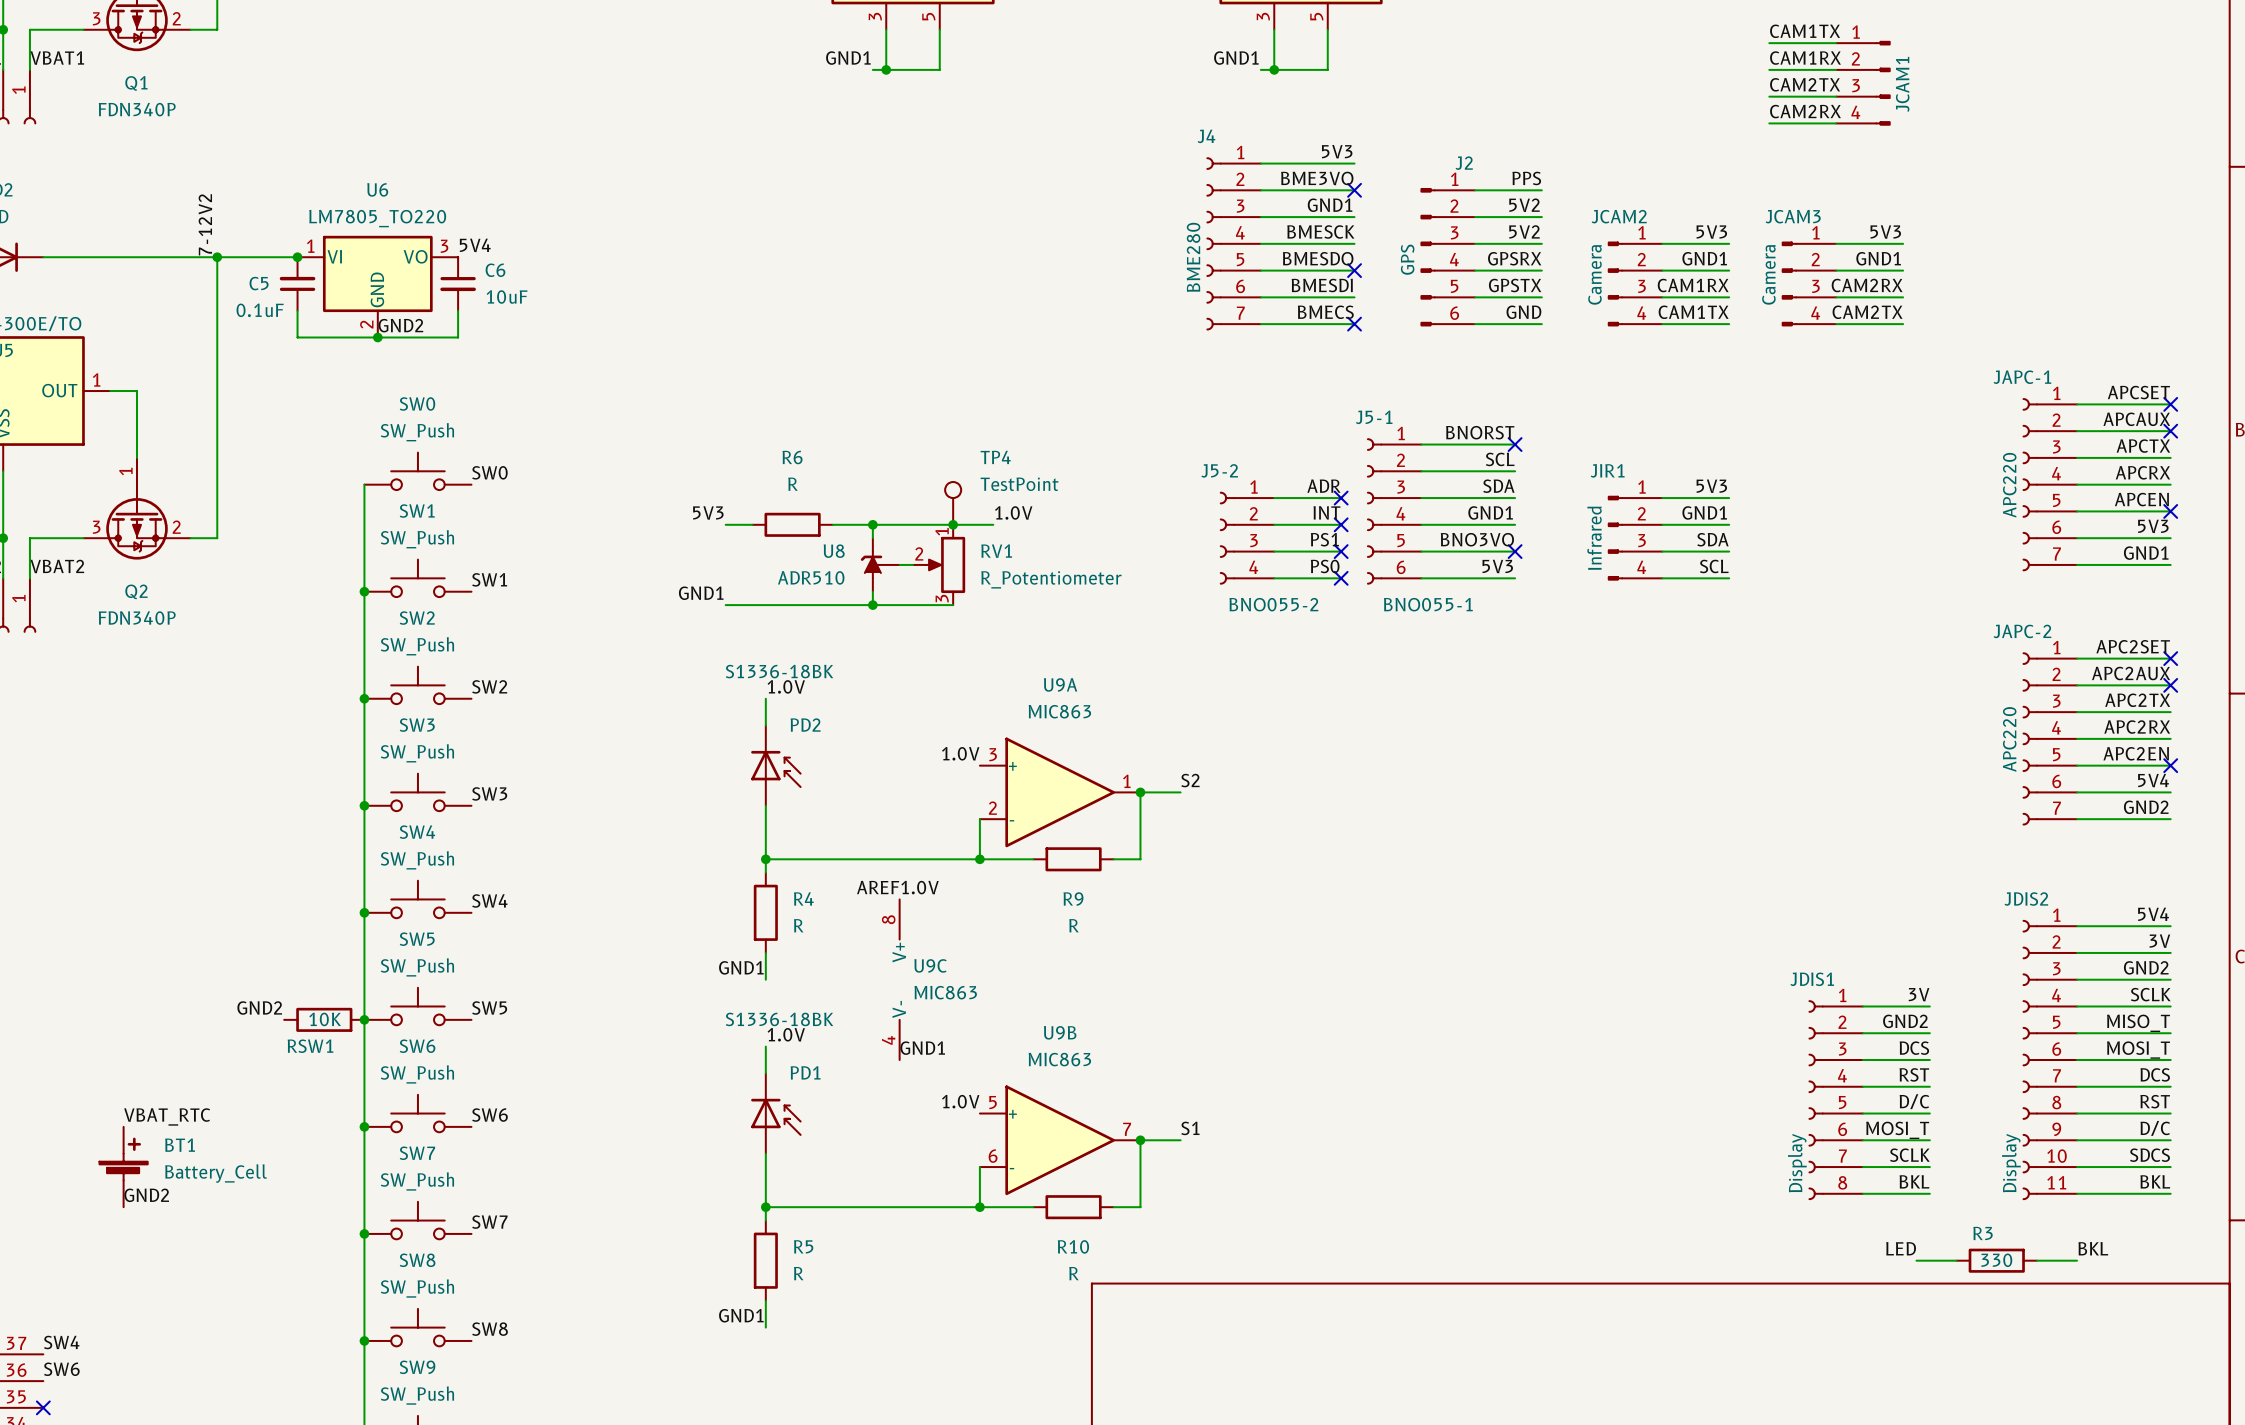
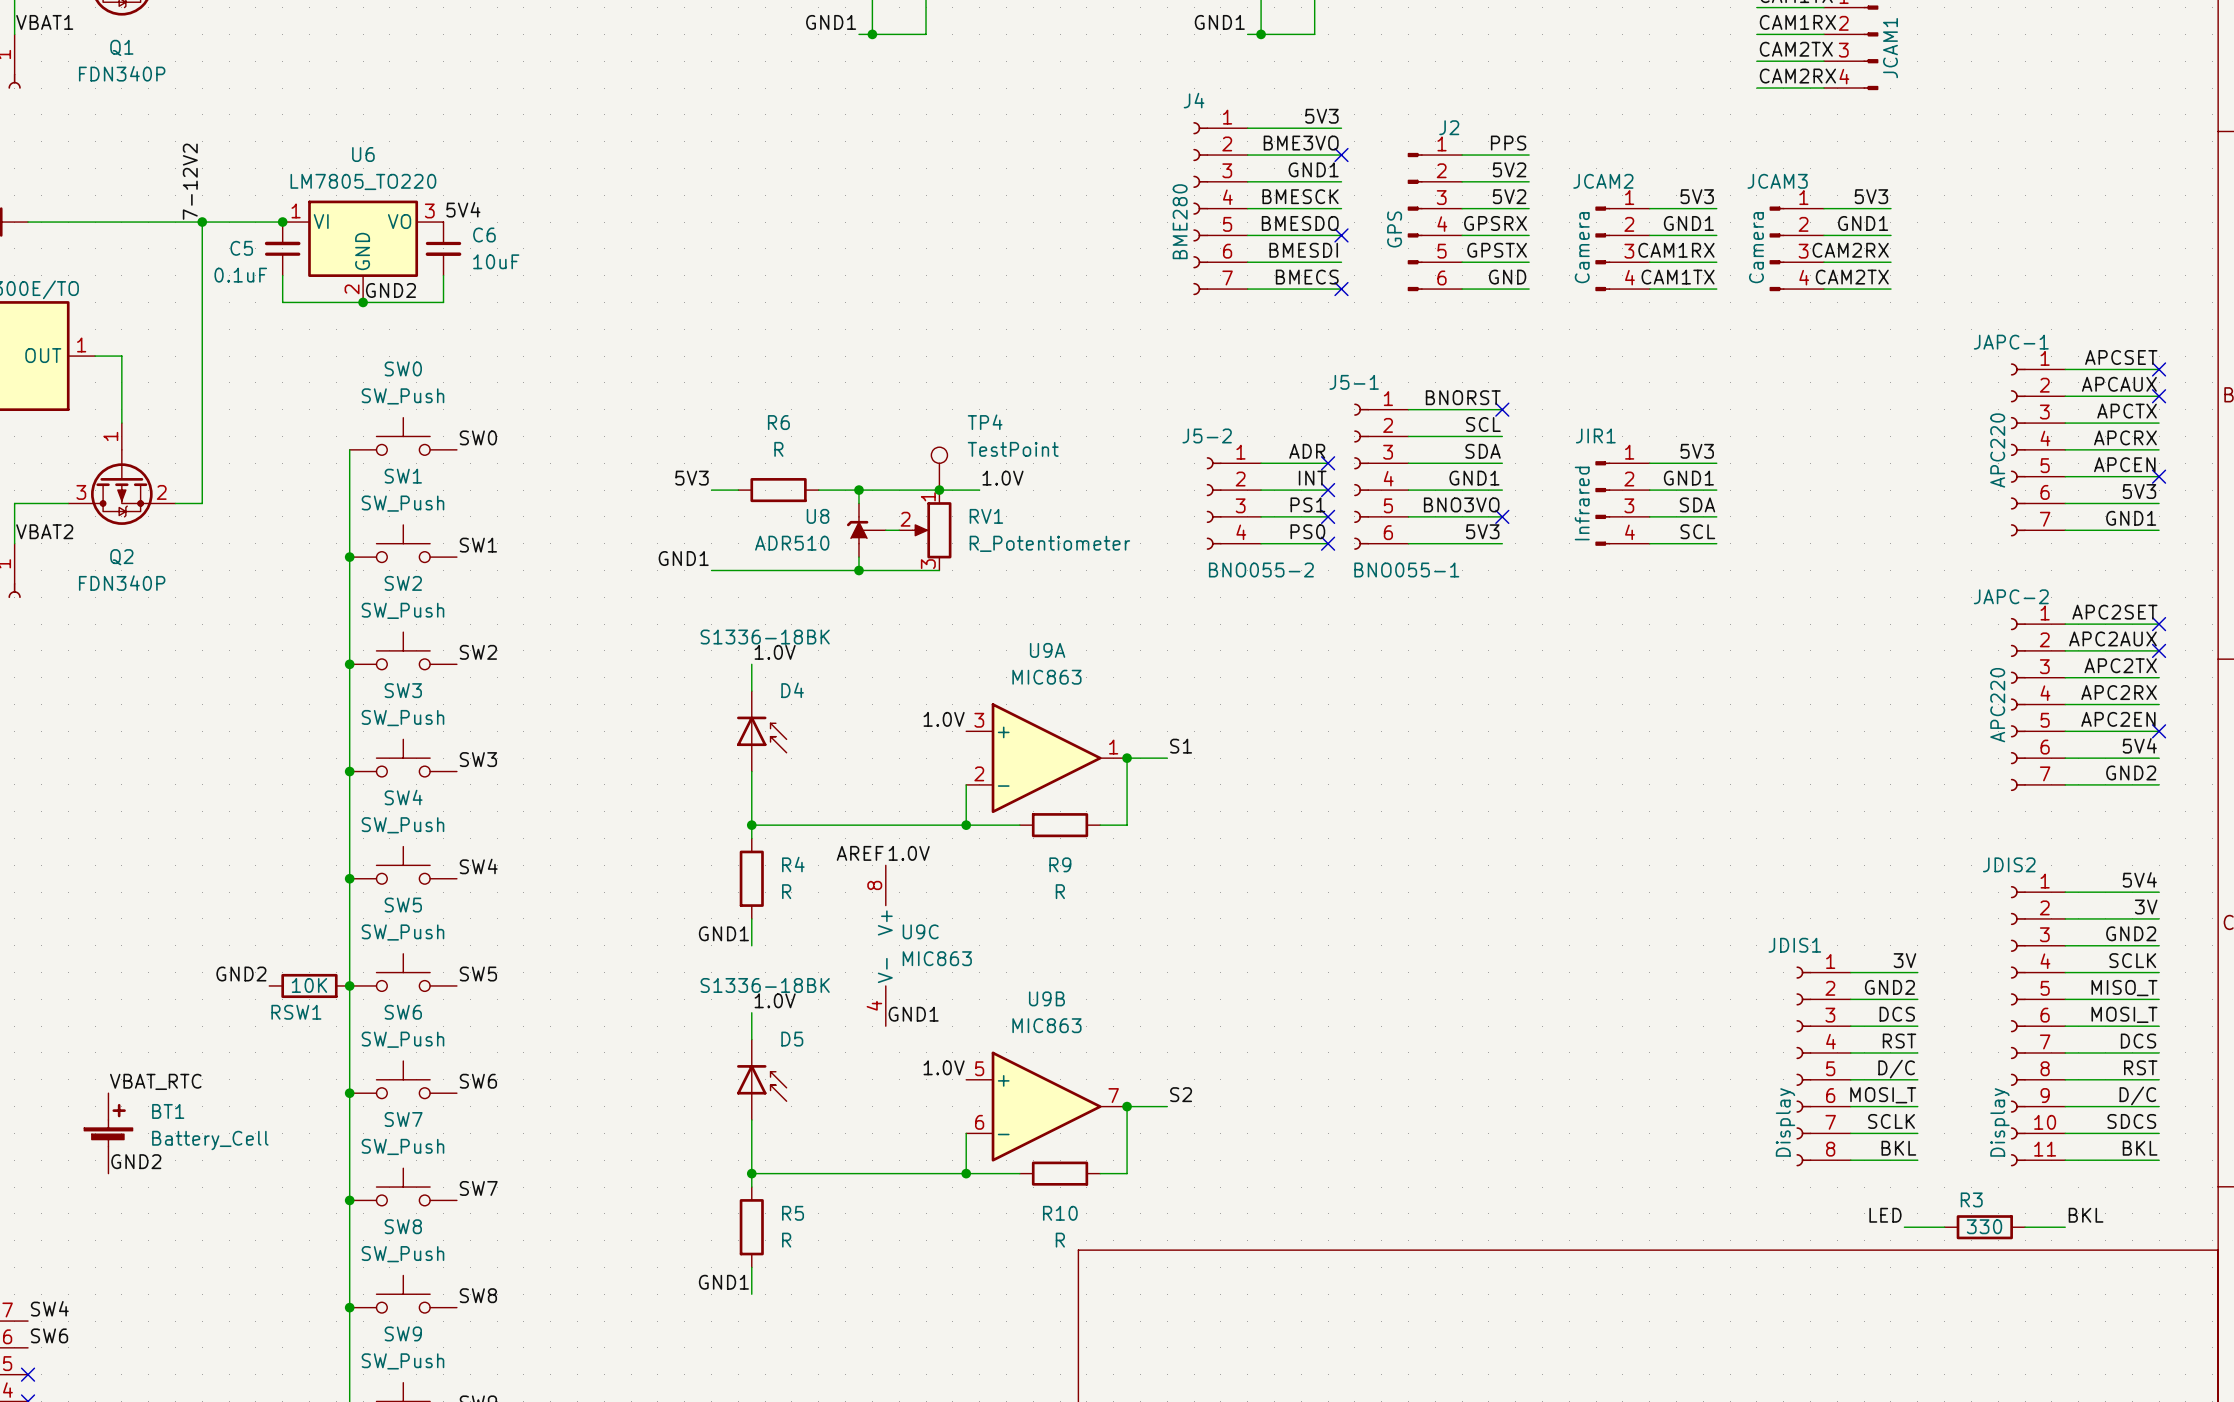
PD2 name: PD2 (805, 725) -> D4 (792, 690)
label: S2 (1190, 780) -> S1 (1181, 746)
PD1 name: PD1 (805, 1072) -> D5 (792, 1039)
label: S1 (1190, 1128) -> S2 (1181, 1094)

